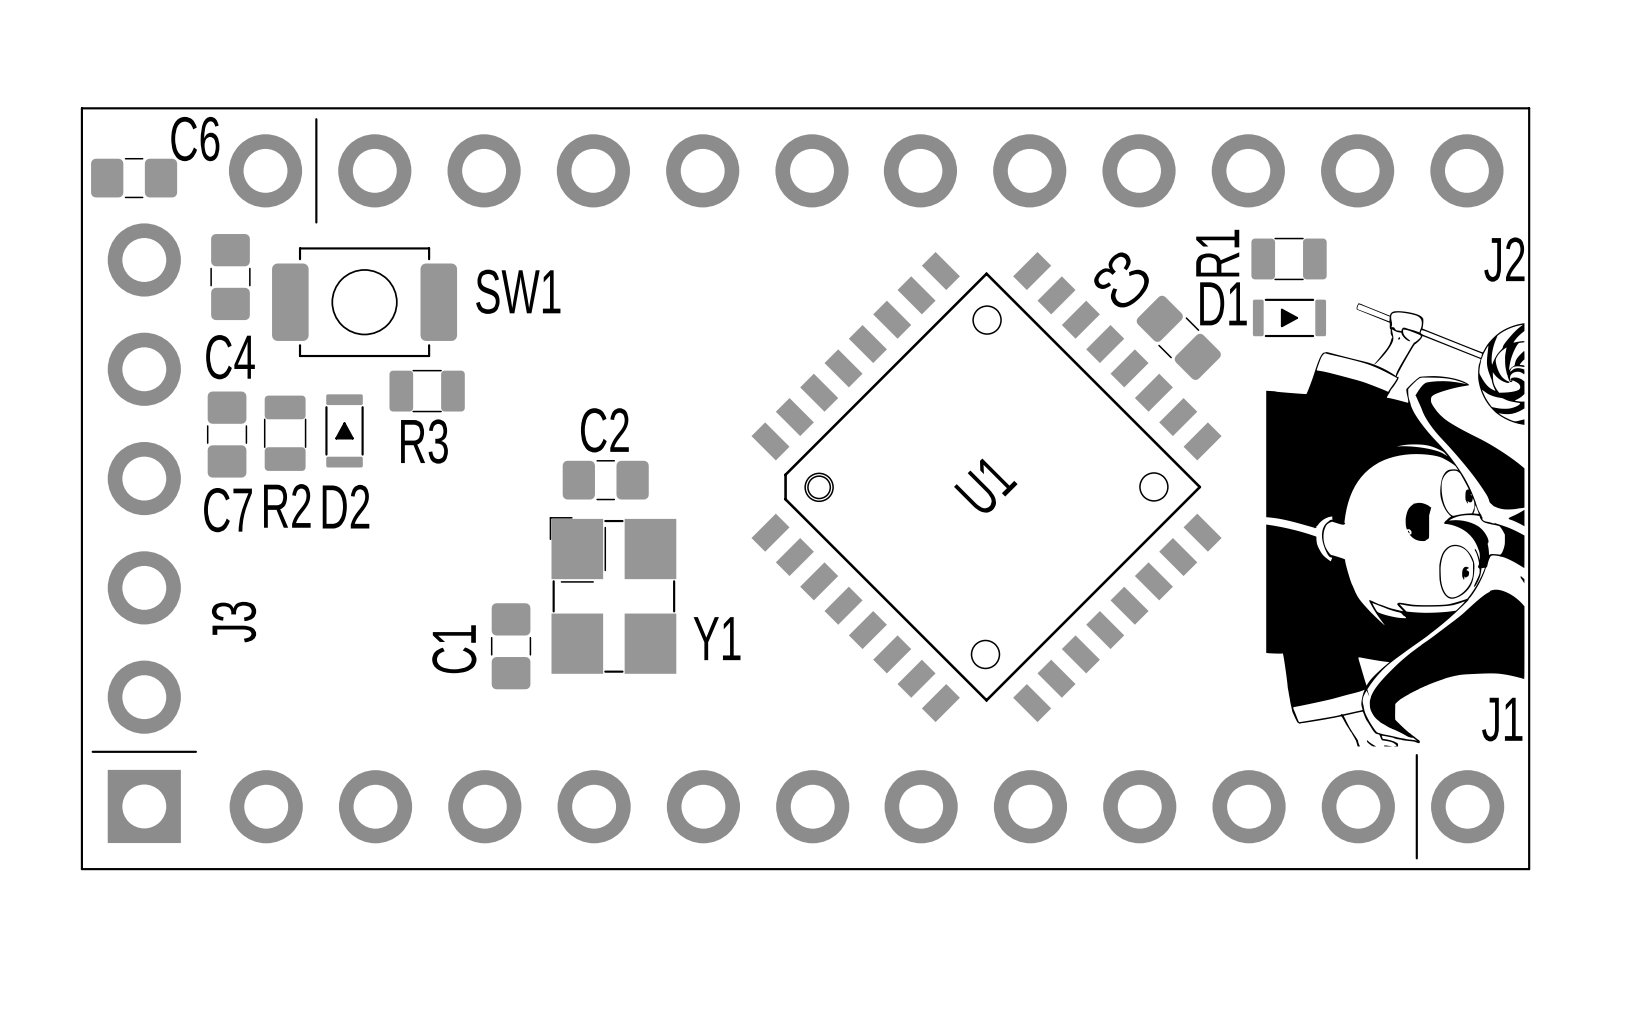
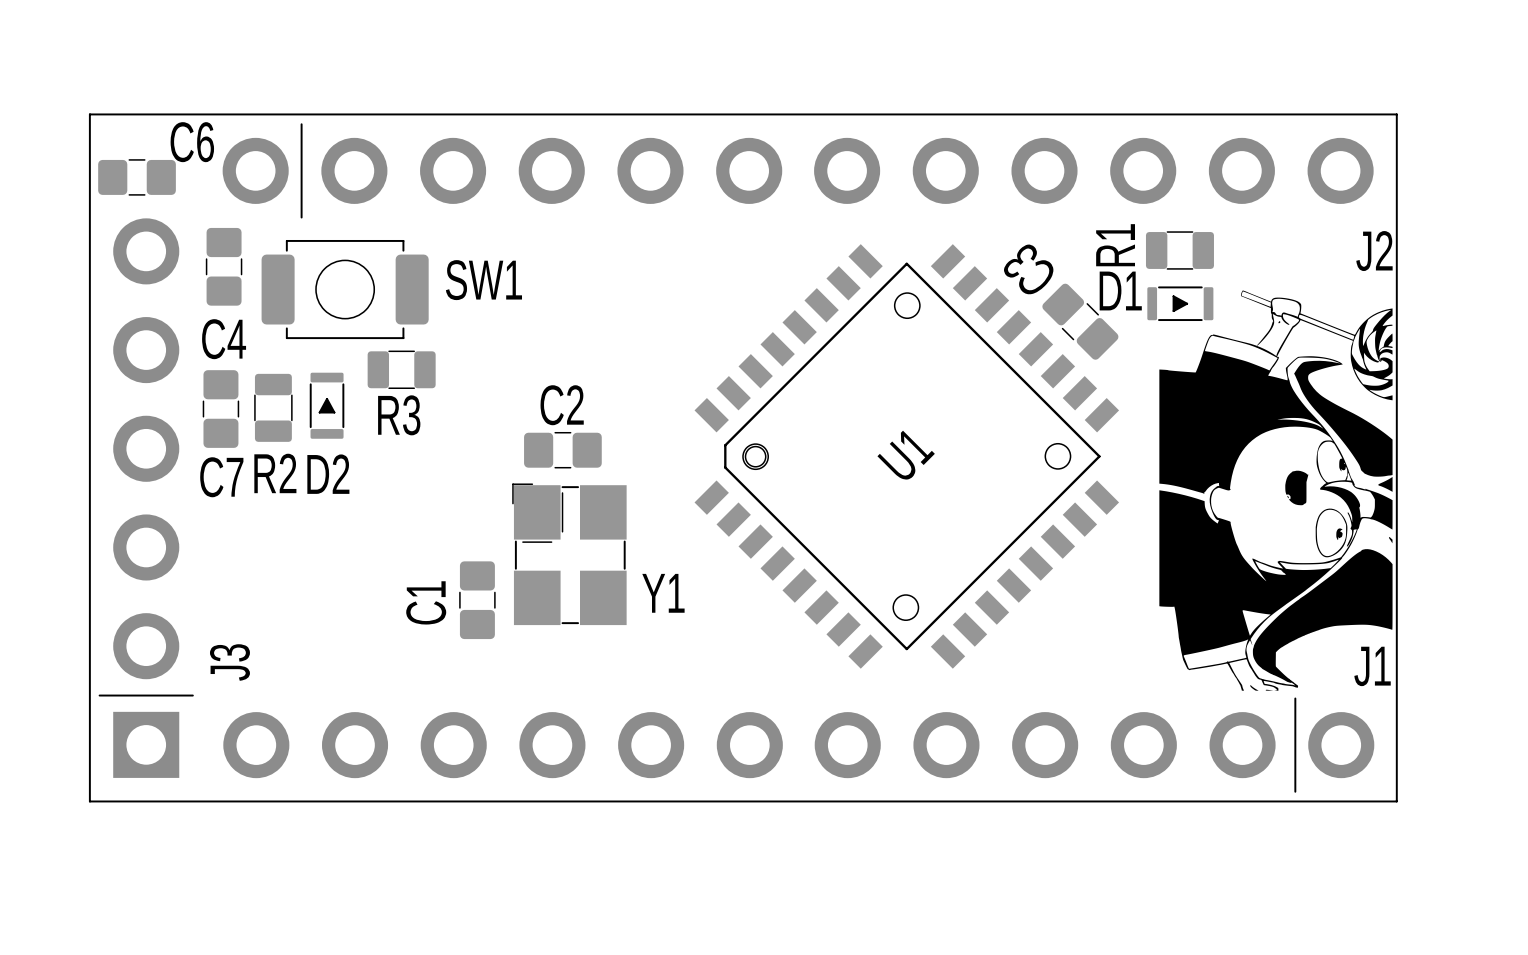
J3 name position: J3 (234, 622) -> J3 (229, 662)

